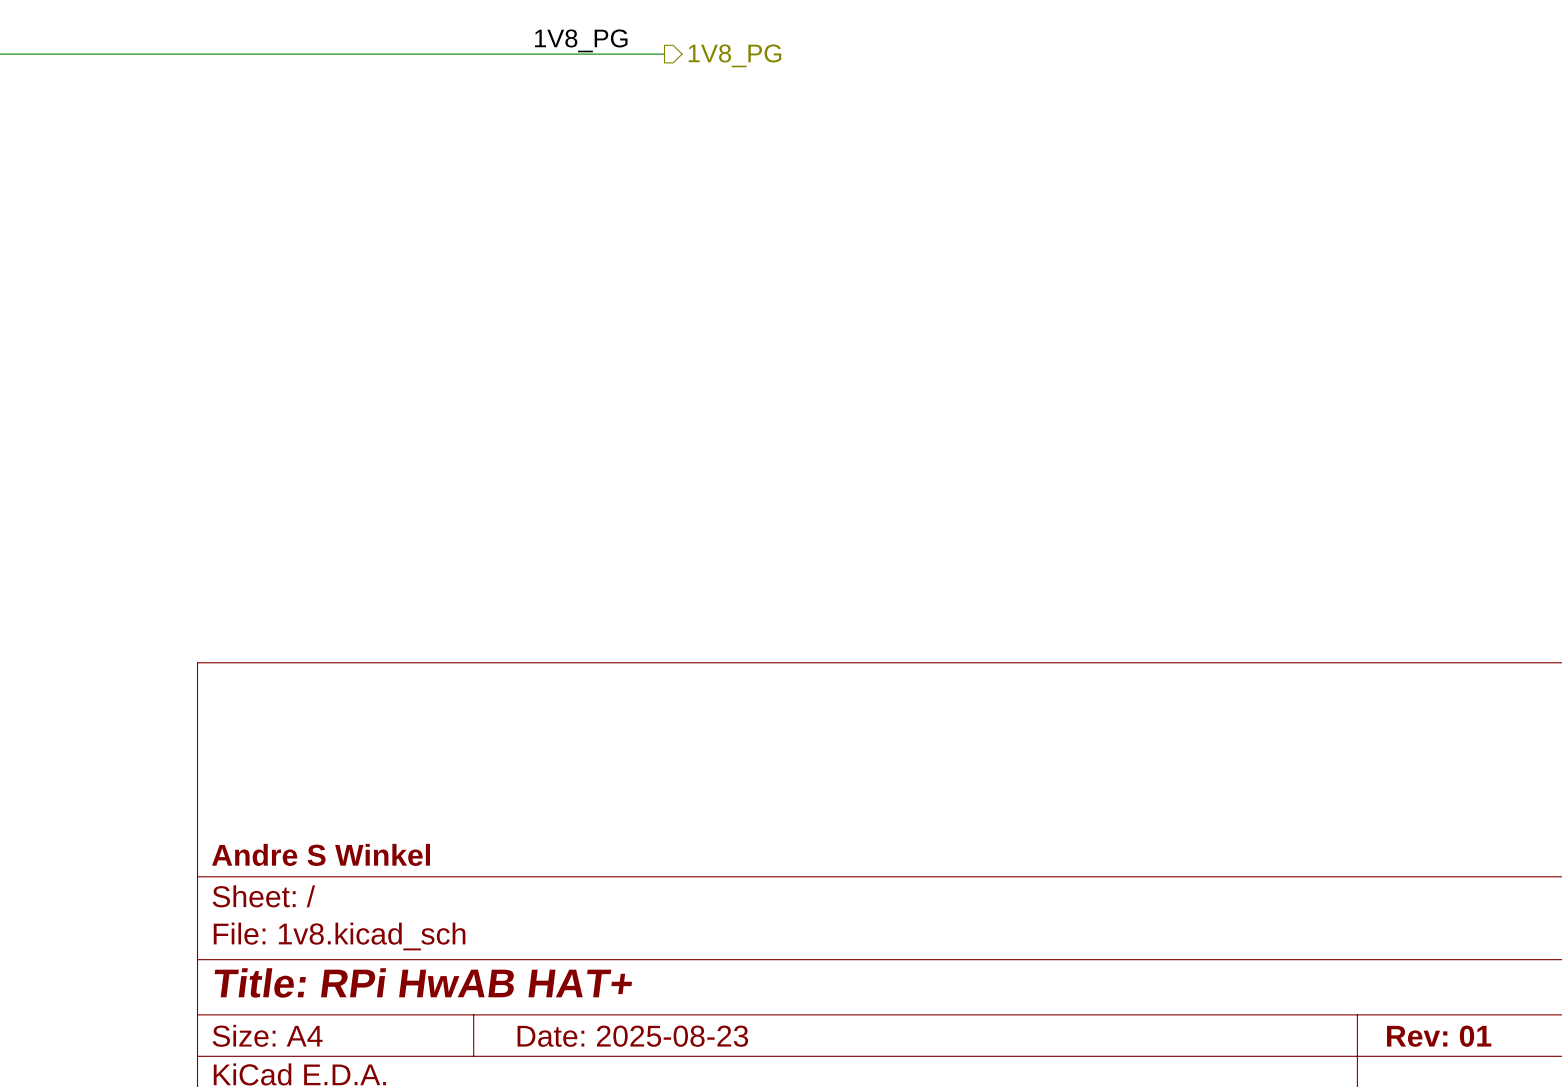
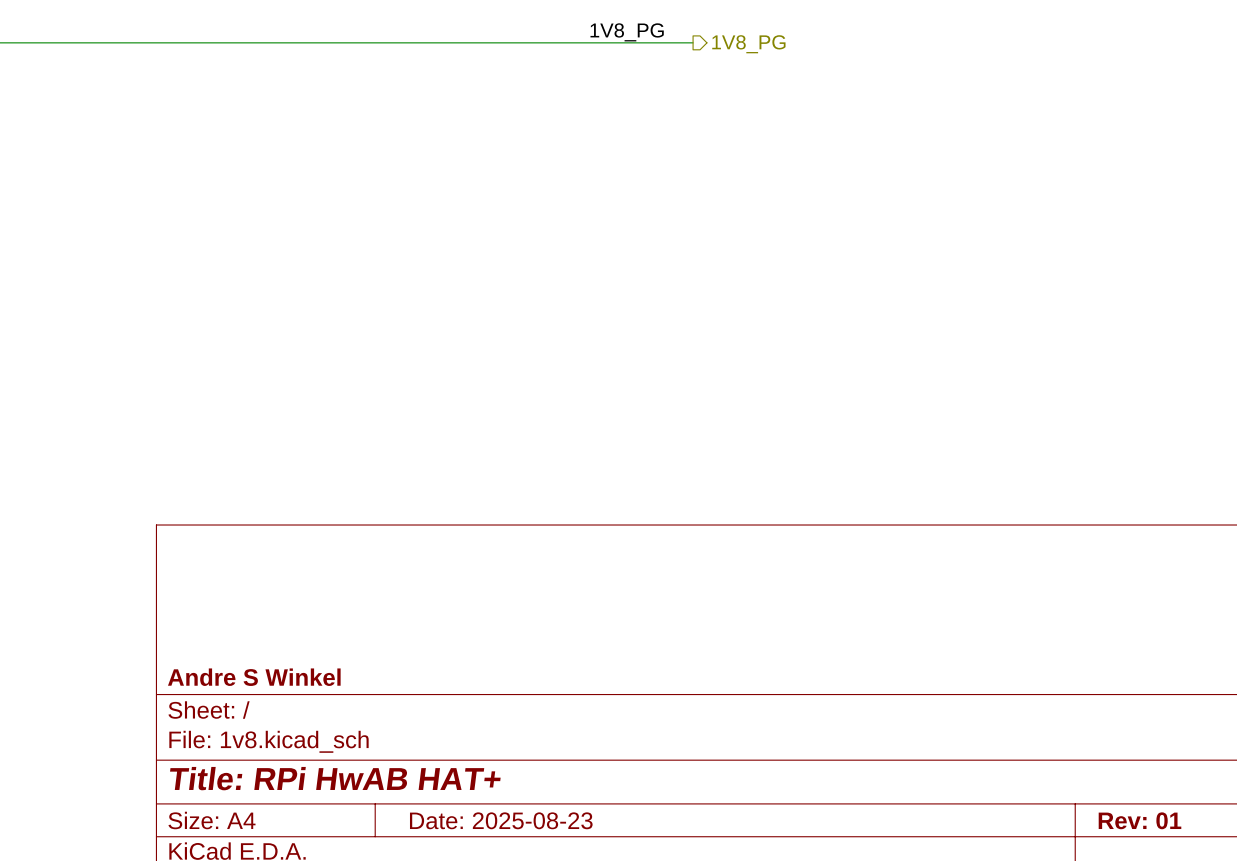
label position: 1V8_PG (581, 40) -> 1V8_PG (627, 32)
wire: none -> (526, 42) (693, 42)
hierarchical label position: 1V8_PG (734, 55) -> 1V8_PG (748, 44)

